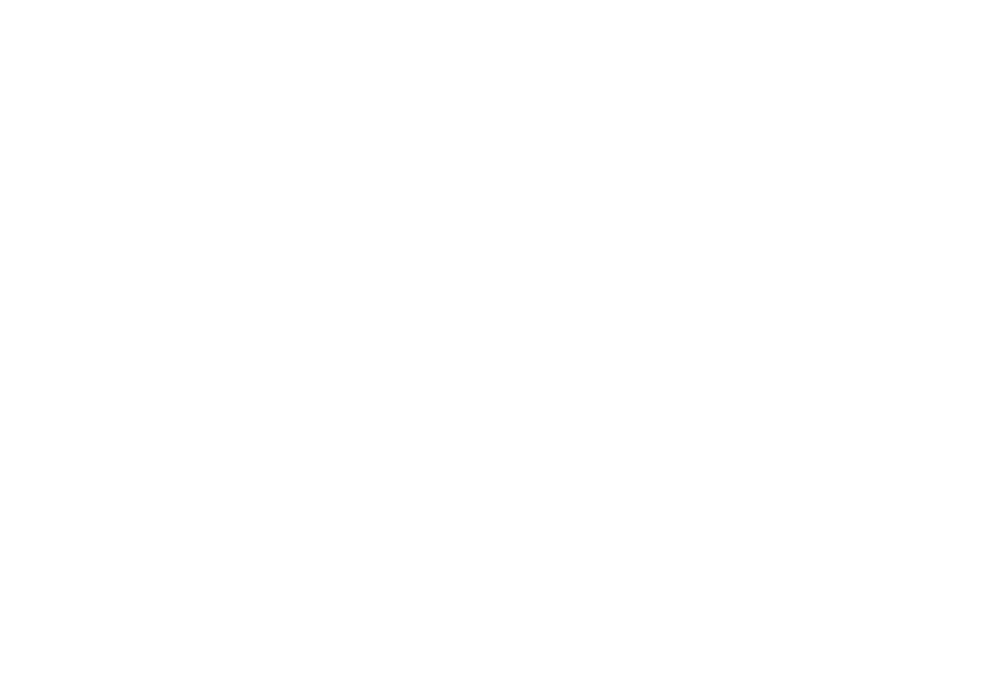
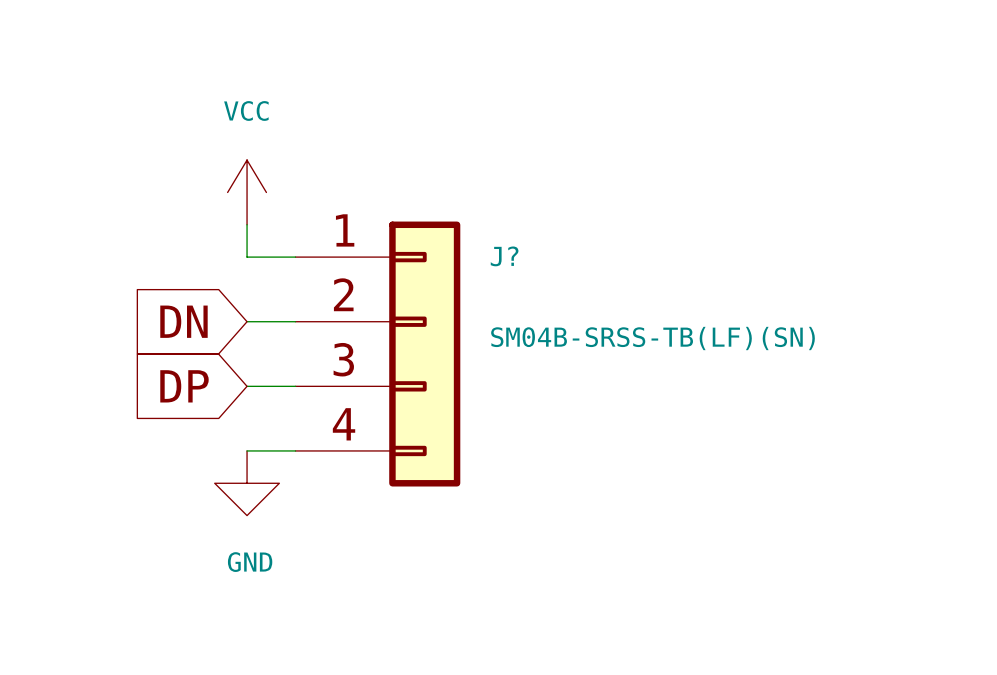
power symbol: none -> VCC (247, 192)
wire: none -> (247, 224) (247, 257) (295, 257)
global label: none -> DN (183, 321)
wire: none -> (247, 321) (295, 321)
J?: none -> SM04B-SRSS-TB(LF)(SN) (377, 354)
global label: none -> DP (184, 386)
wire: none -> (247, 386) (295, 386)
wire: none -> (247, 450) (295, 450)
power symbol: none -> GND (247, 483)

